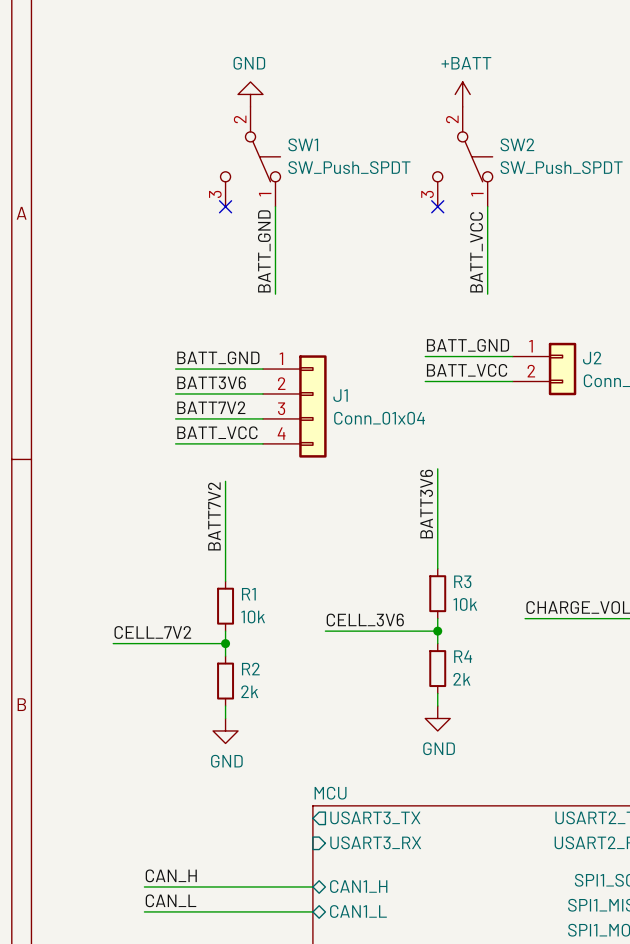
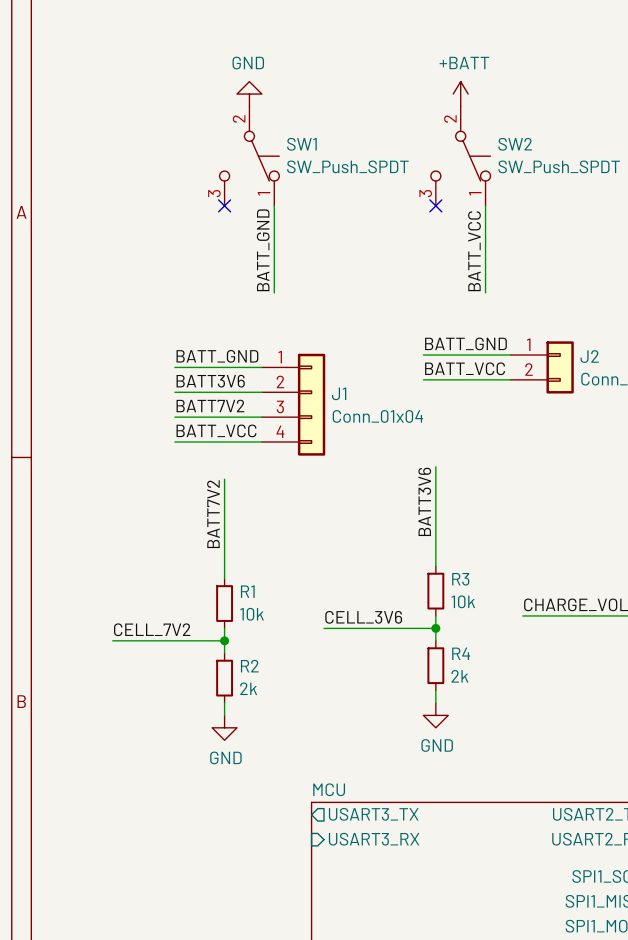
label: CAN_H (171, 875) -> none
wire: (144, 886) (312, 886) -> none
sheet pin: CAN1_H (358, 886) -> none
label: CAN_L (170, 900) -> none
wire: (144, 911) (312, 911) -> none
sheet pin: CAN1_L (358, 911) -> none

